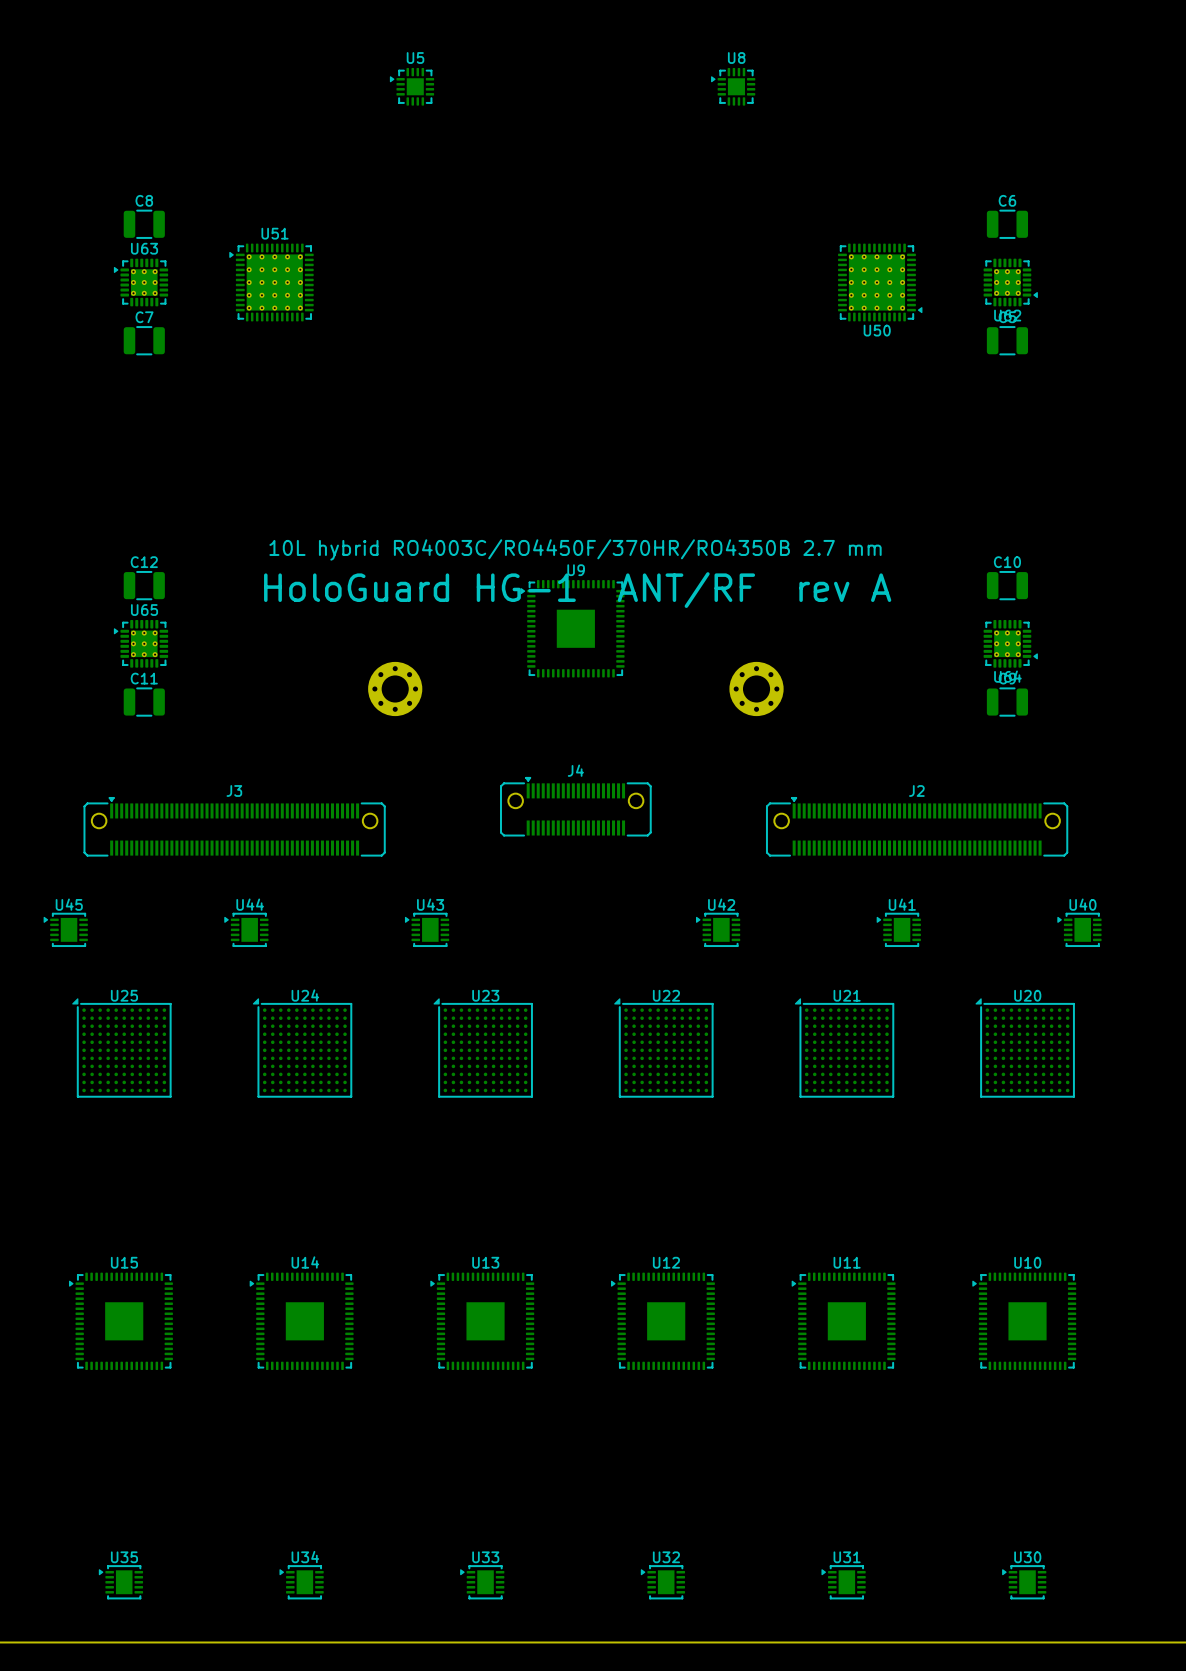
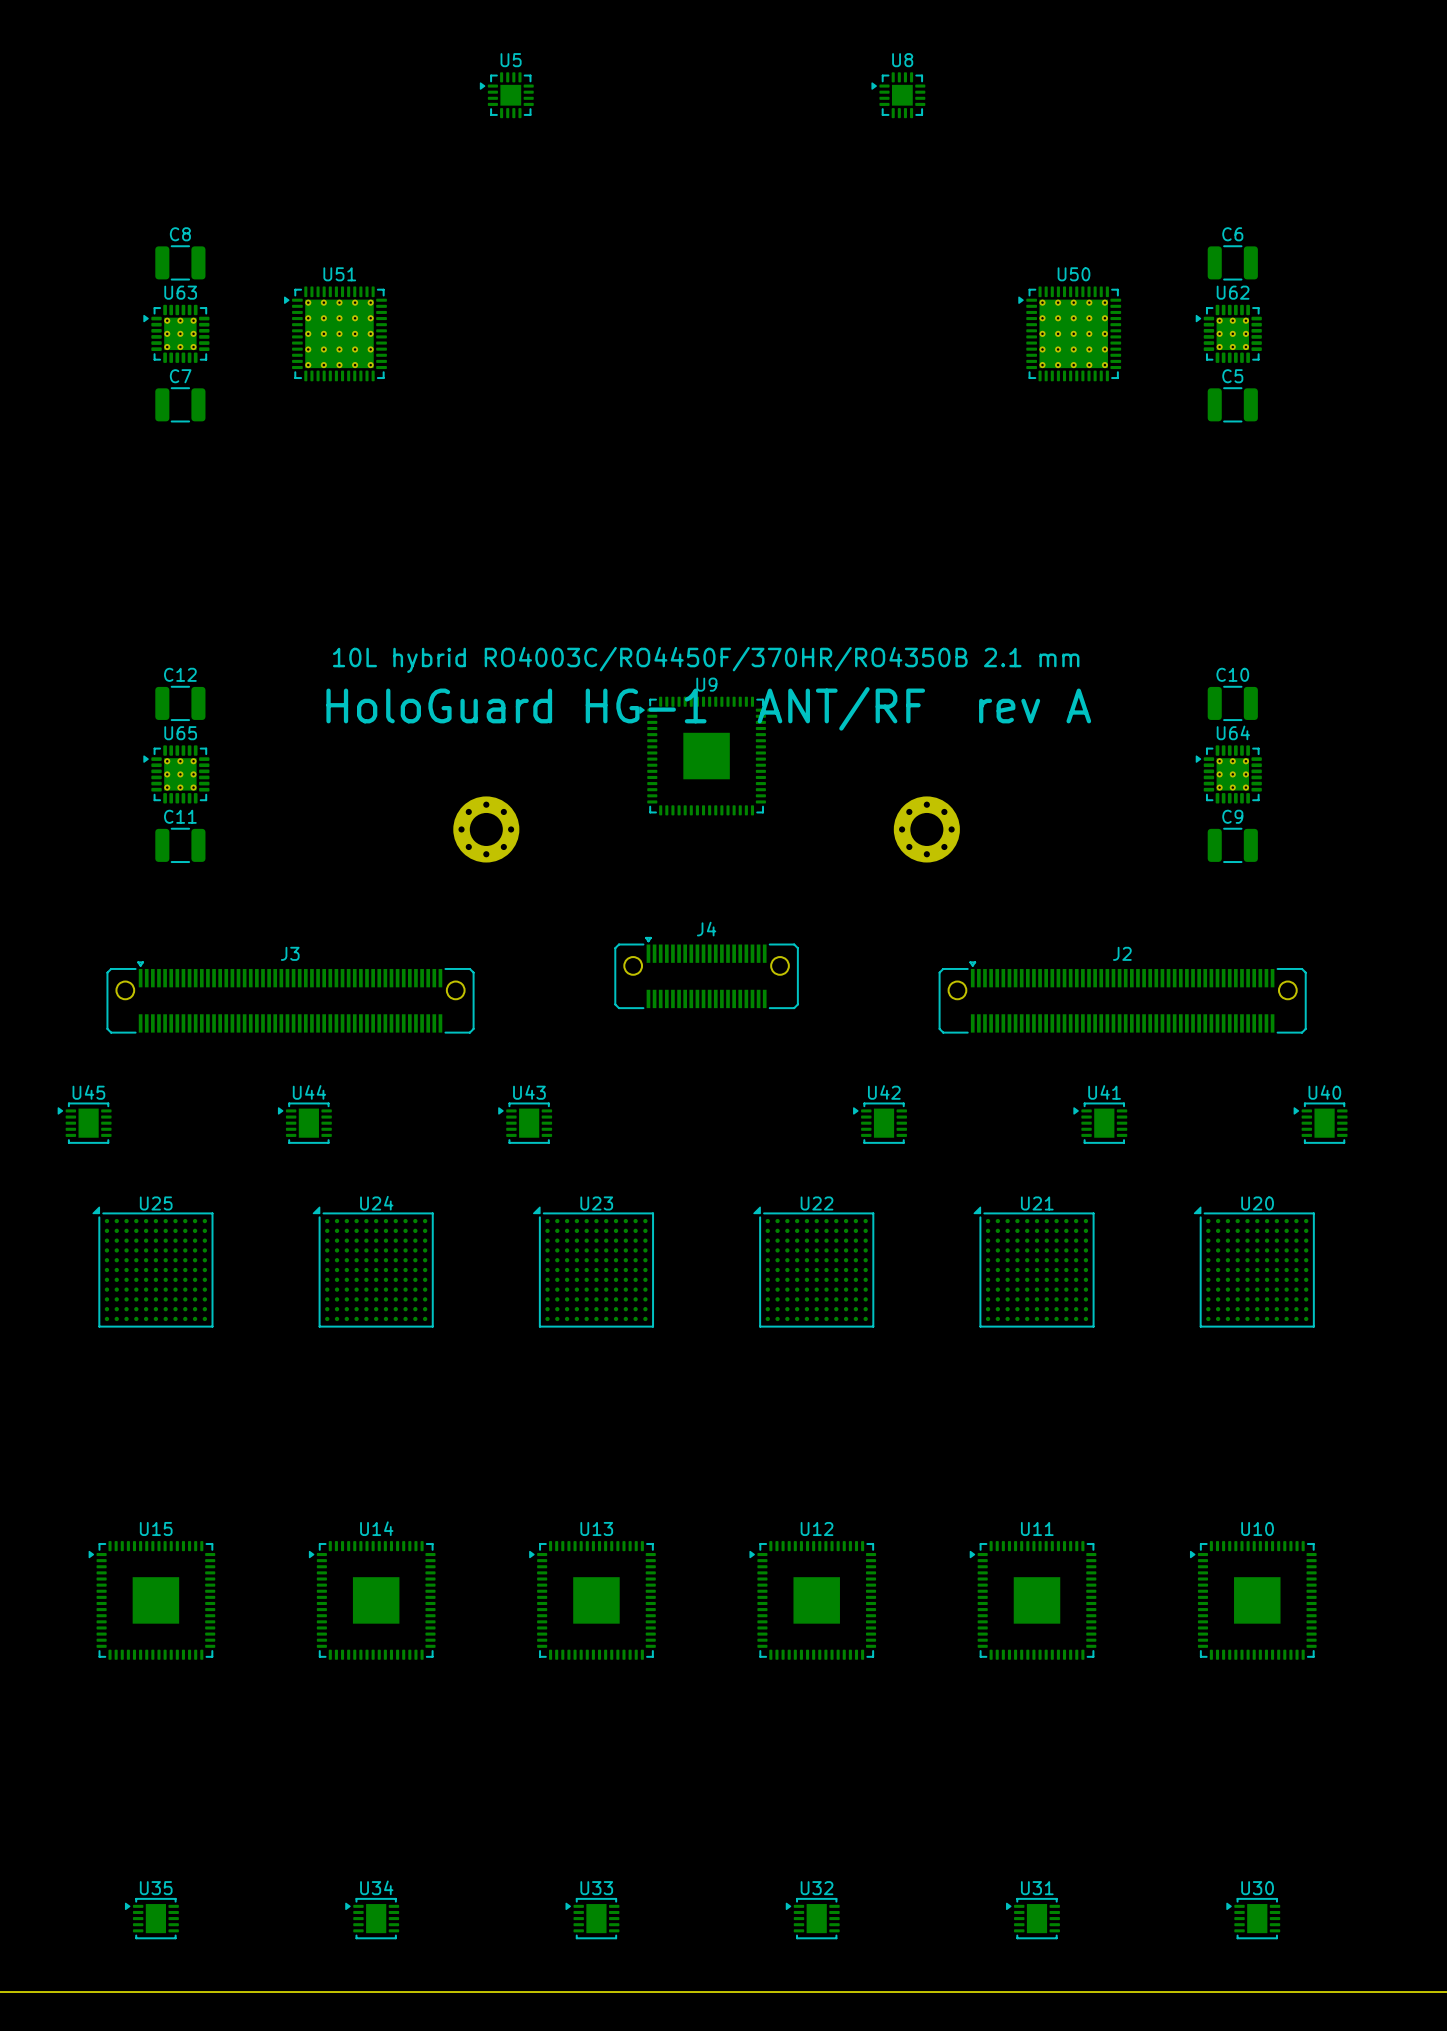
U50 rotation: 0° (880, 282) -> 180° (1069, 333)
U62 rotation: 0° (1010, 282) -> 180° (1228, 333)
text: 10L hybrid RO4003C/RO4450F/370HR/RO4350B 2.7 mm (575, 549) -> 10L hybrid RO4003C/RO4450F/370HR/RO4350B 2.1 mm (706, 659)
U64 rotation: 0° (1010, 643) -> 180° (1228, 774)

